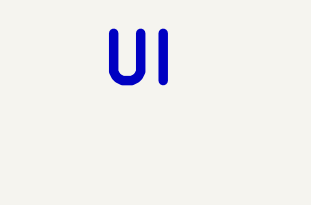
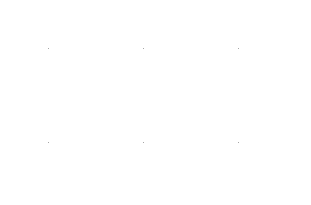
text: UI (138, 56) -> none

